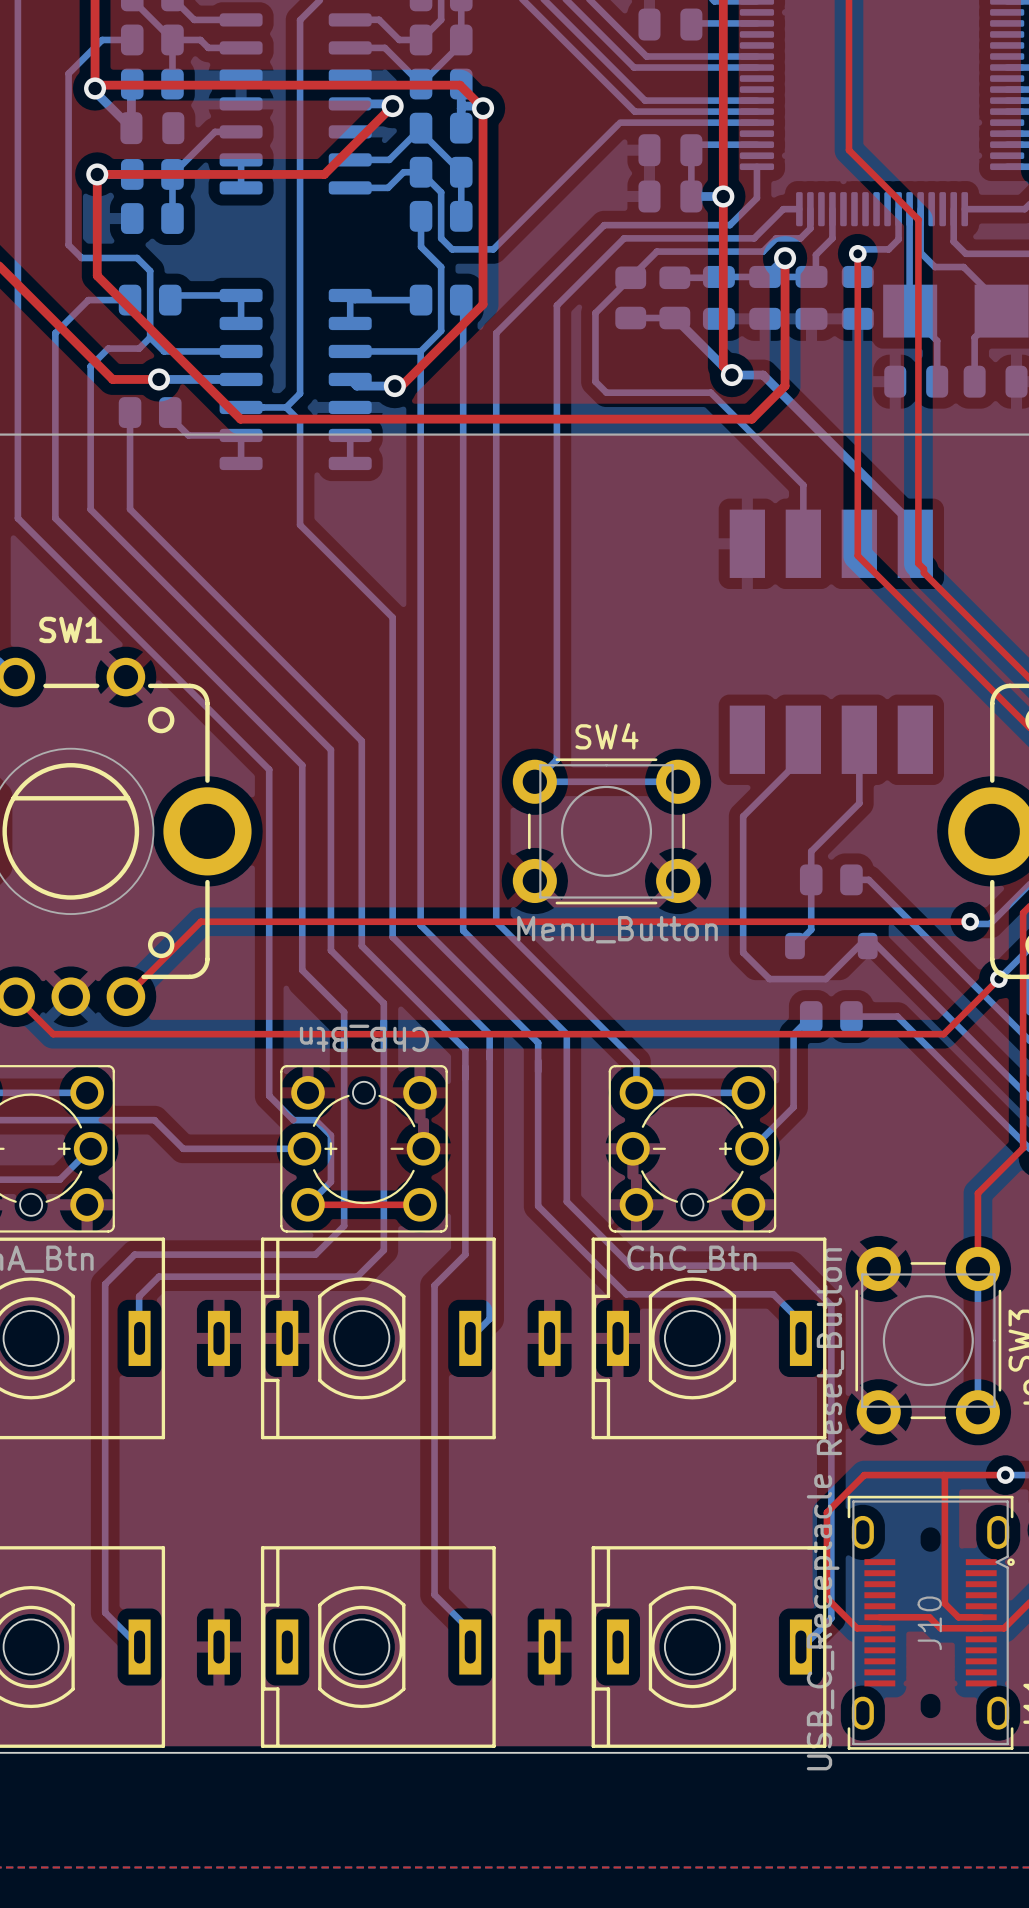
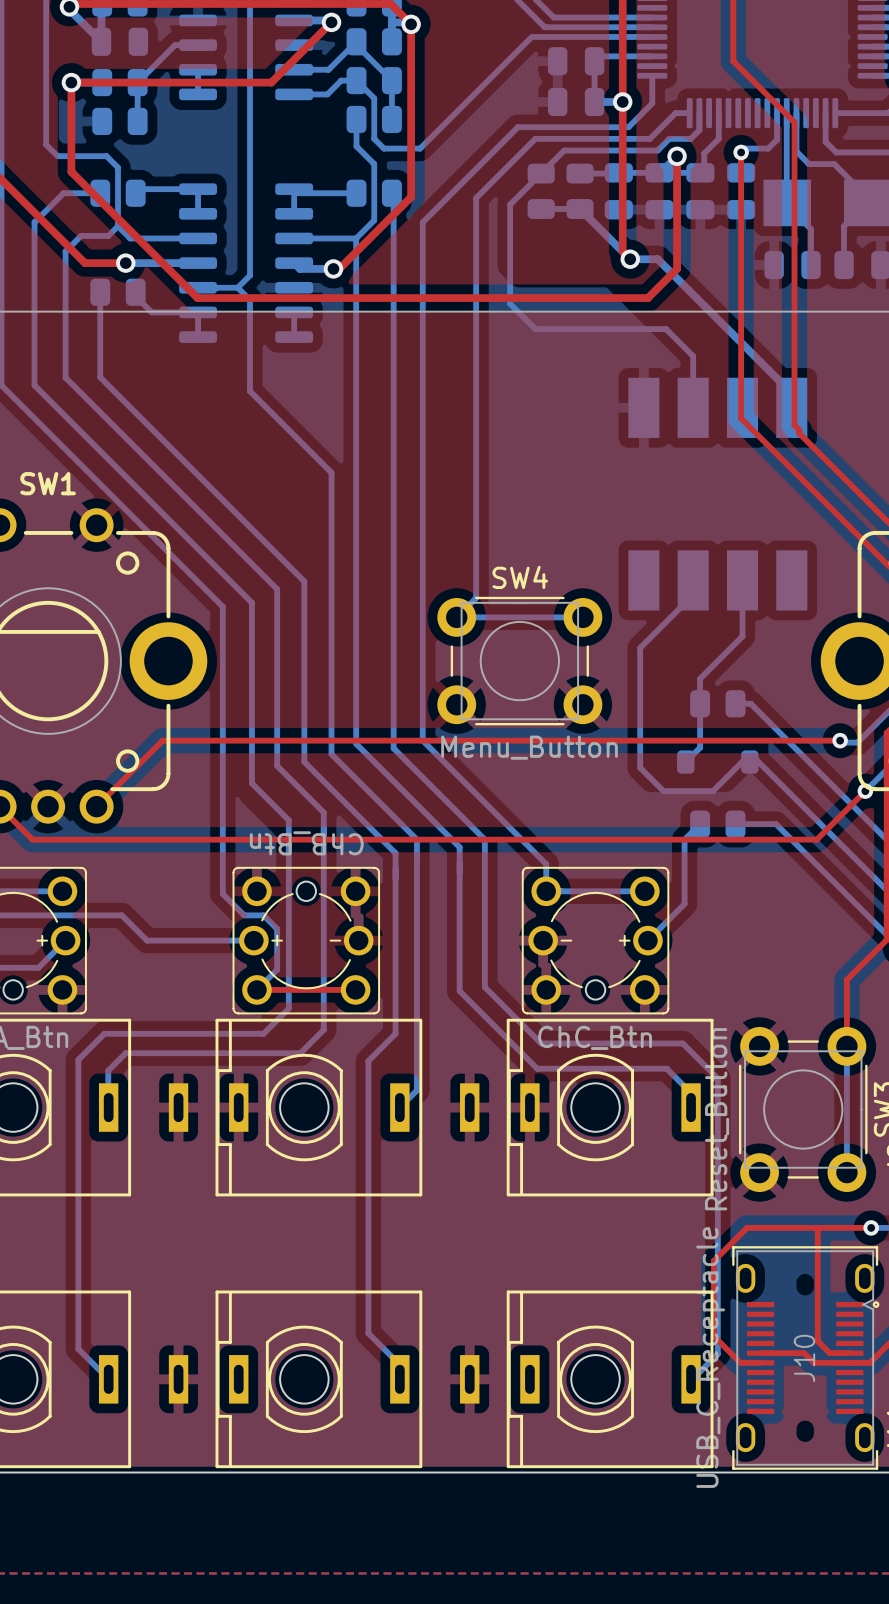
bottom track: (595, 381) (606, 392) (710, 392) (772, 454) -> (510, 265) (510, 303) (535, 329) (666, 329)

